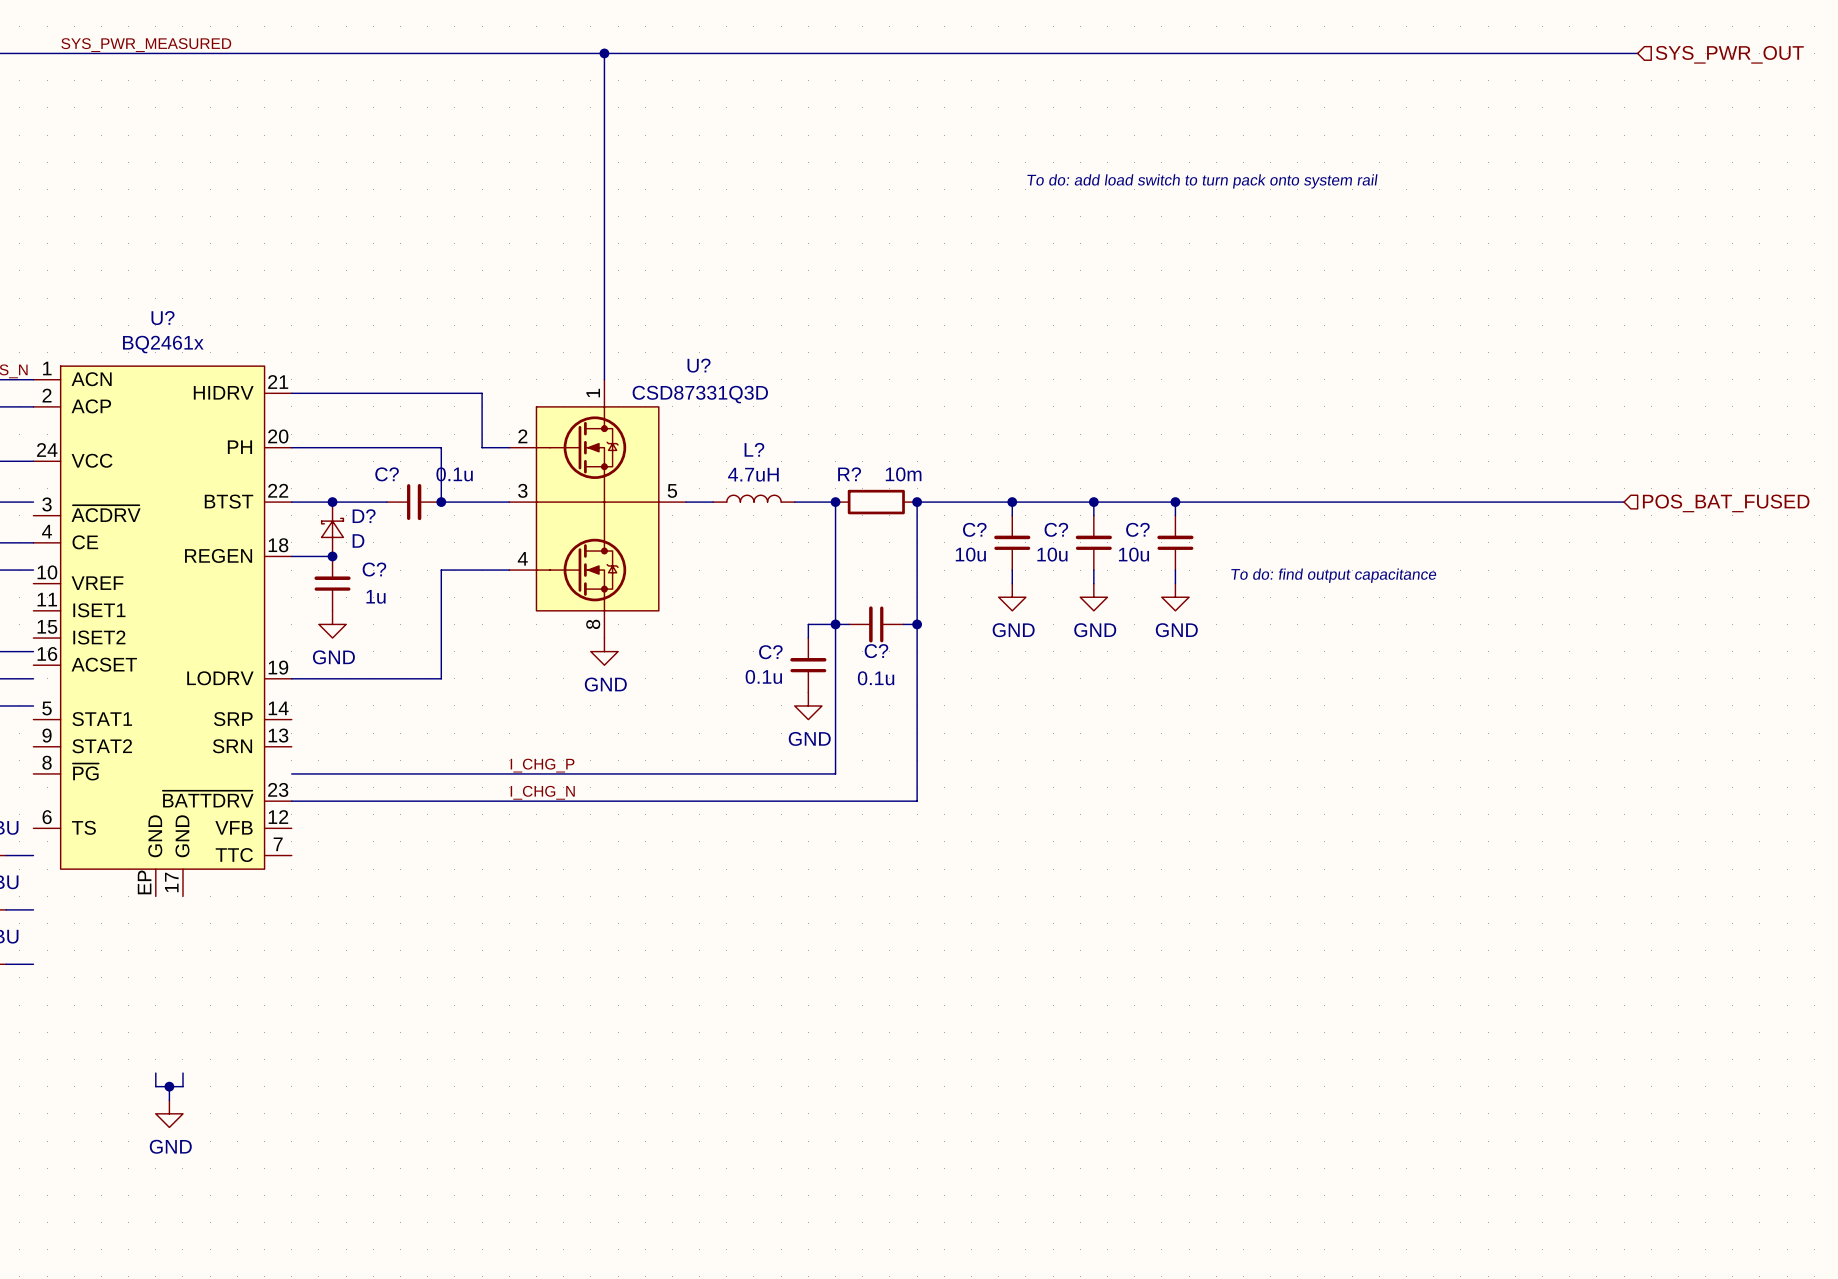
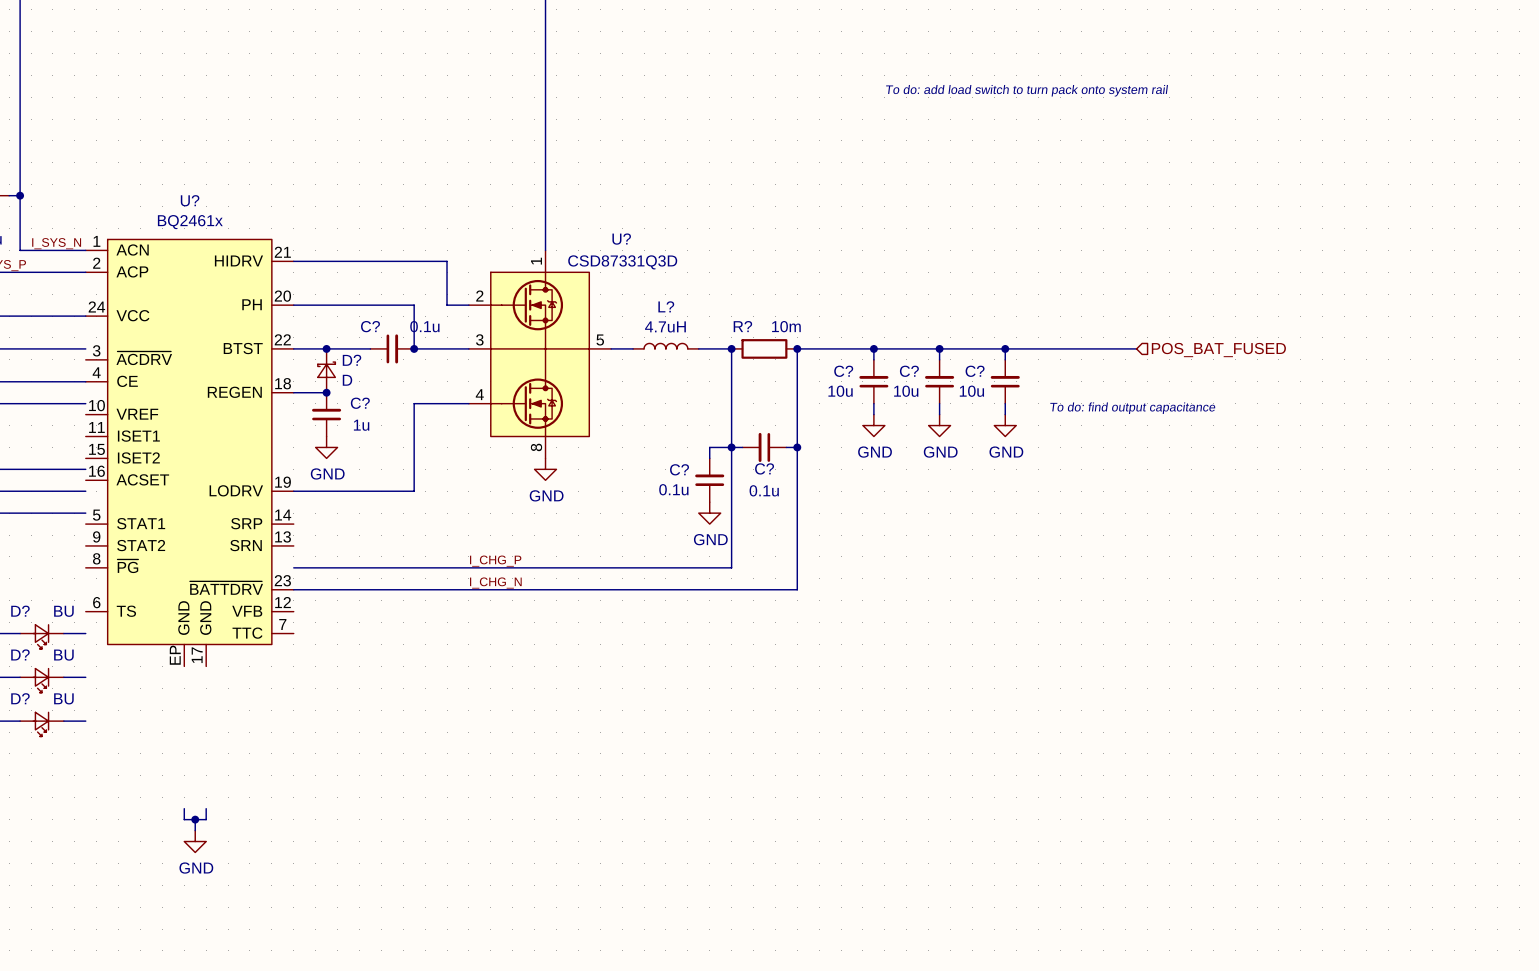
wire: (1338, 502) (1624, 502) -> none
hierarchical label: none -> POS_BAT_FUSED (1218, 350)
hierarchical label: POS_BAT_FUSED (1726, 503) -> none

